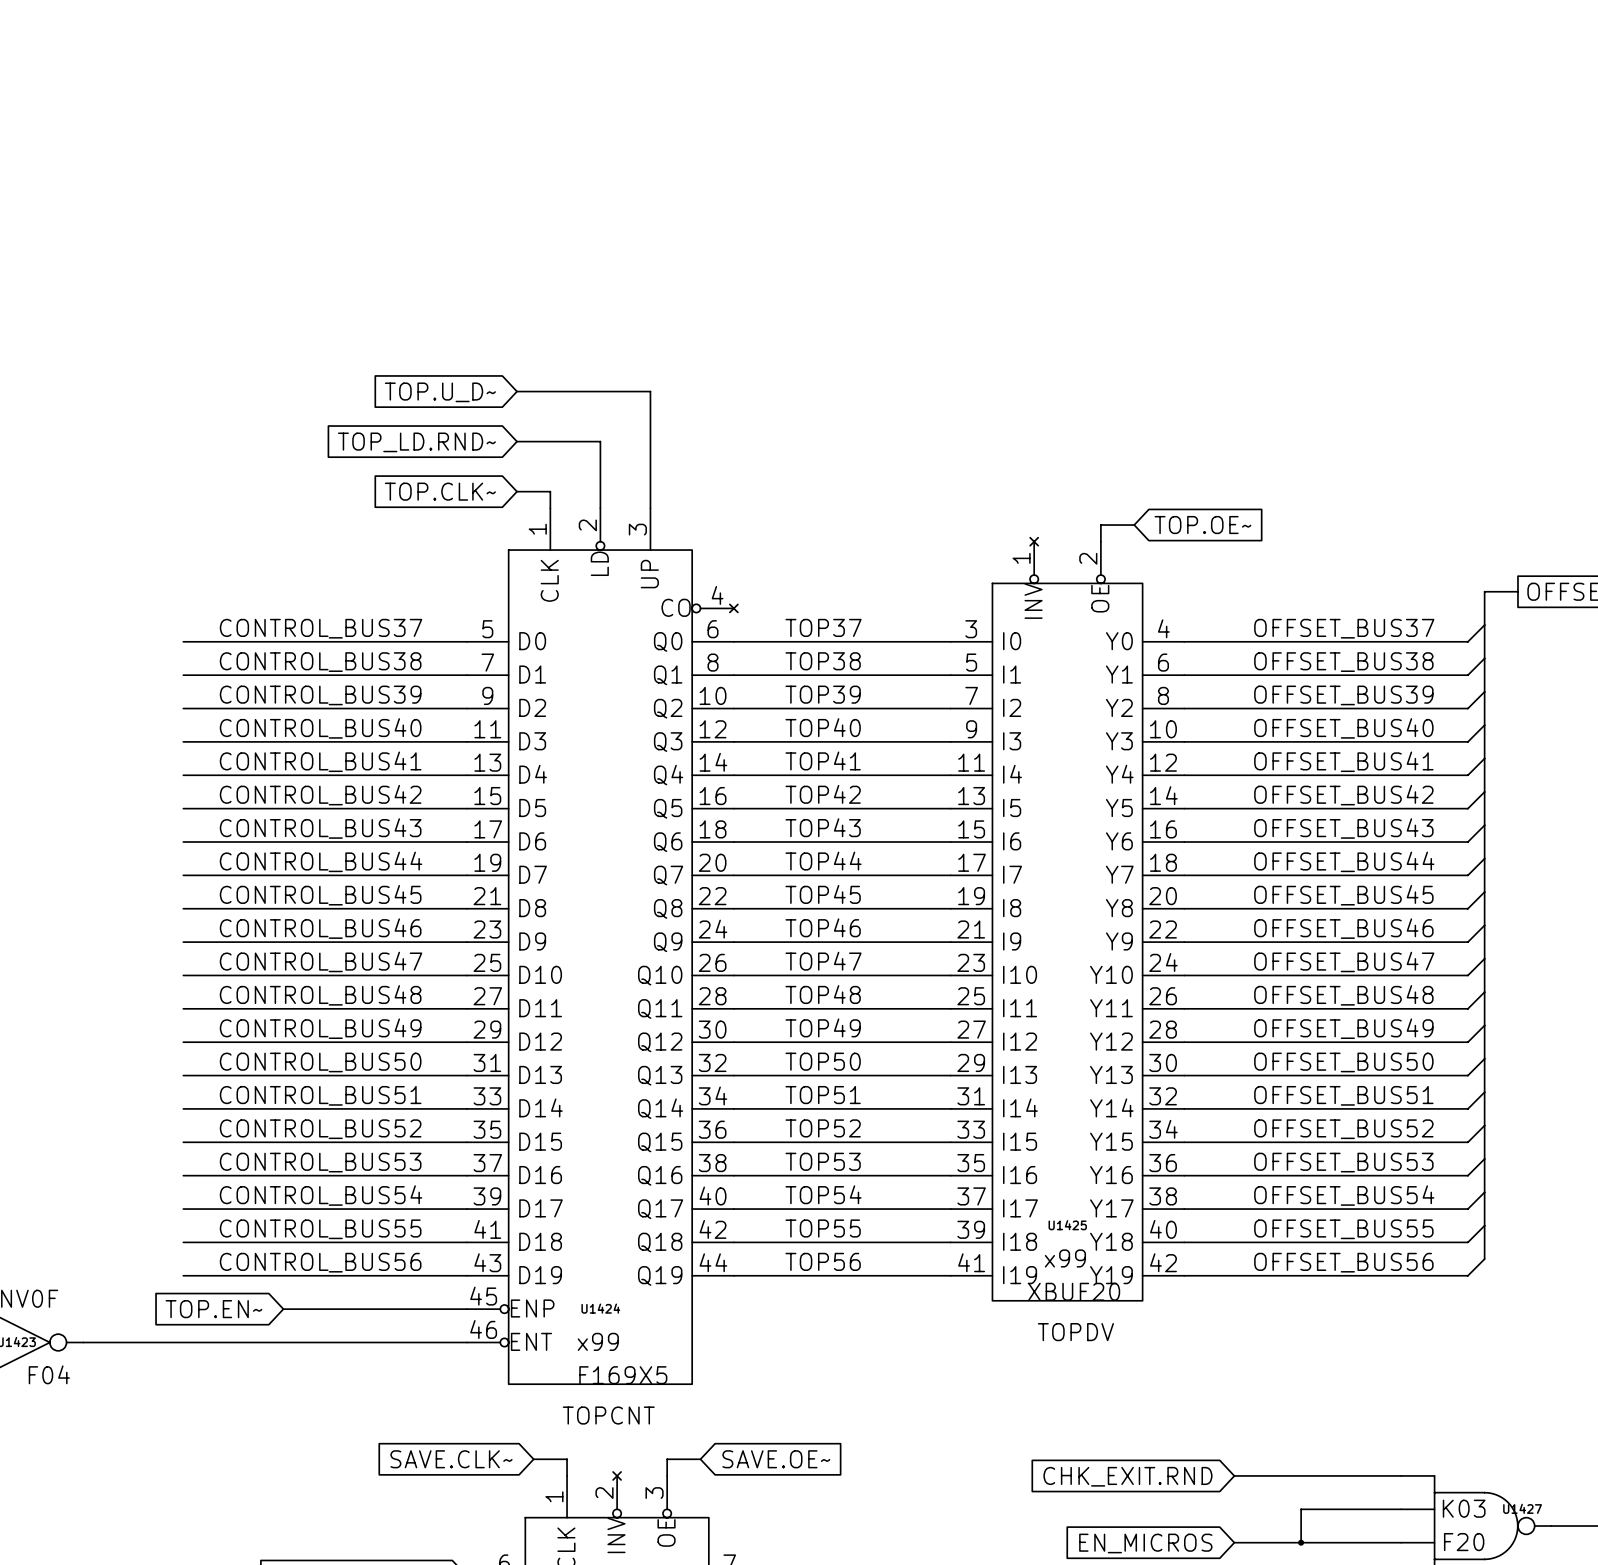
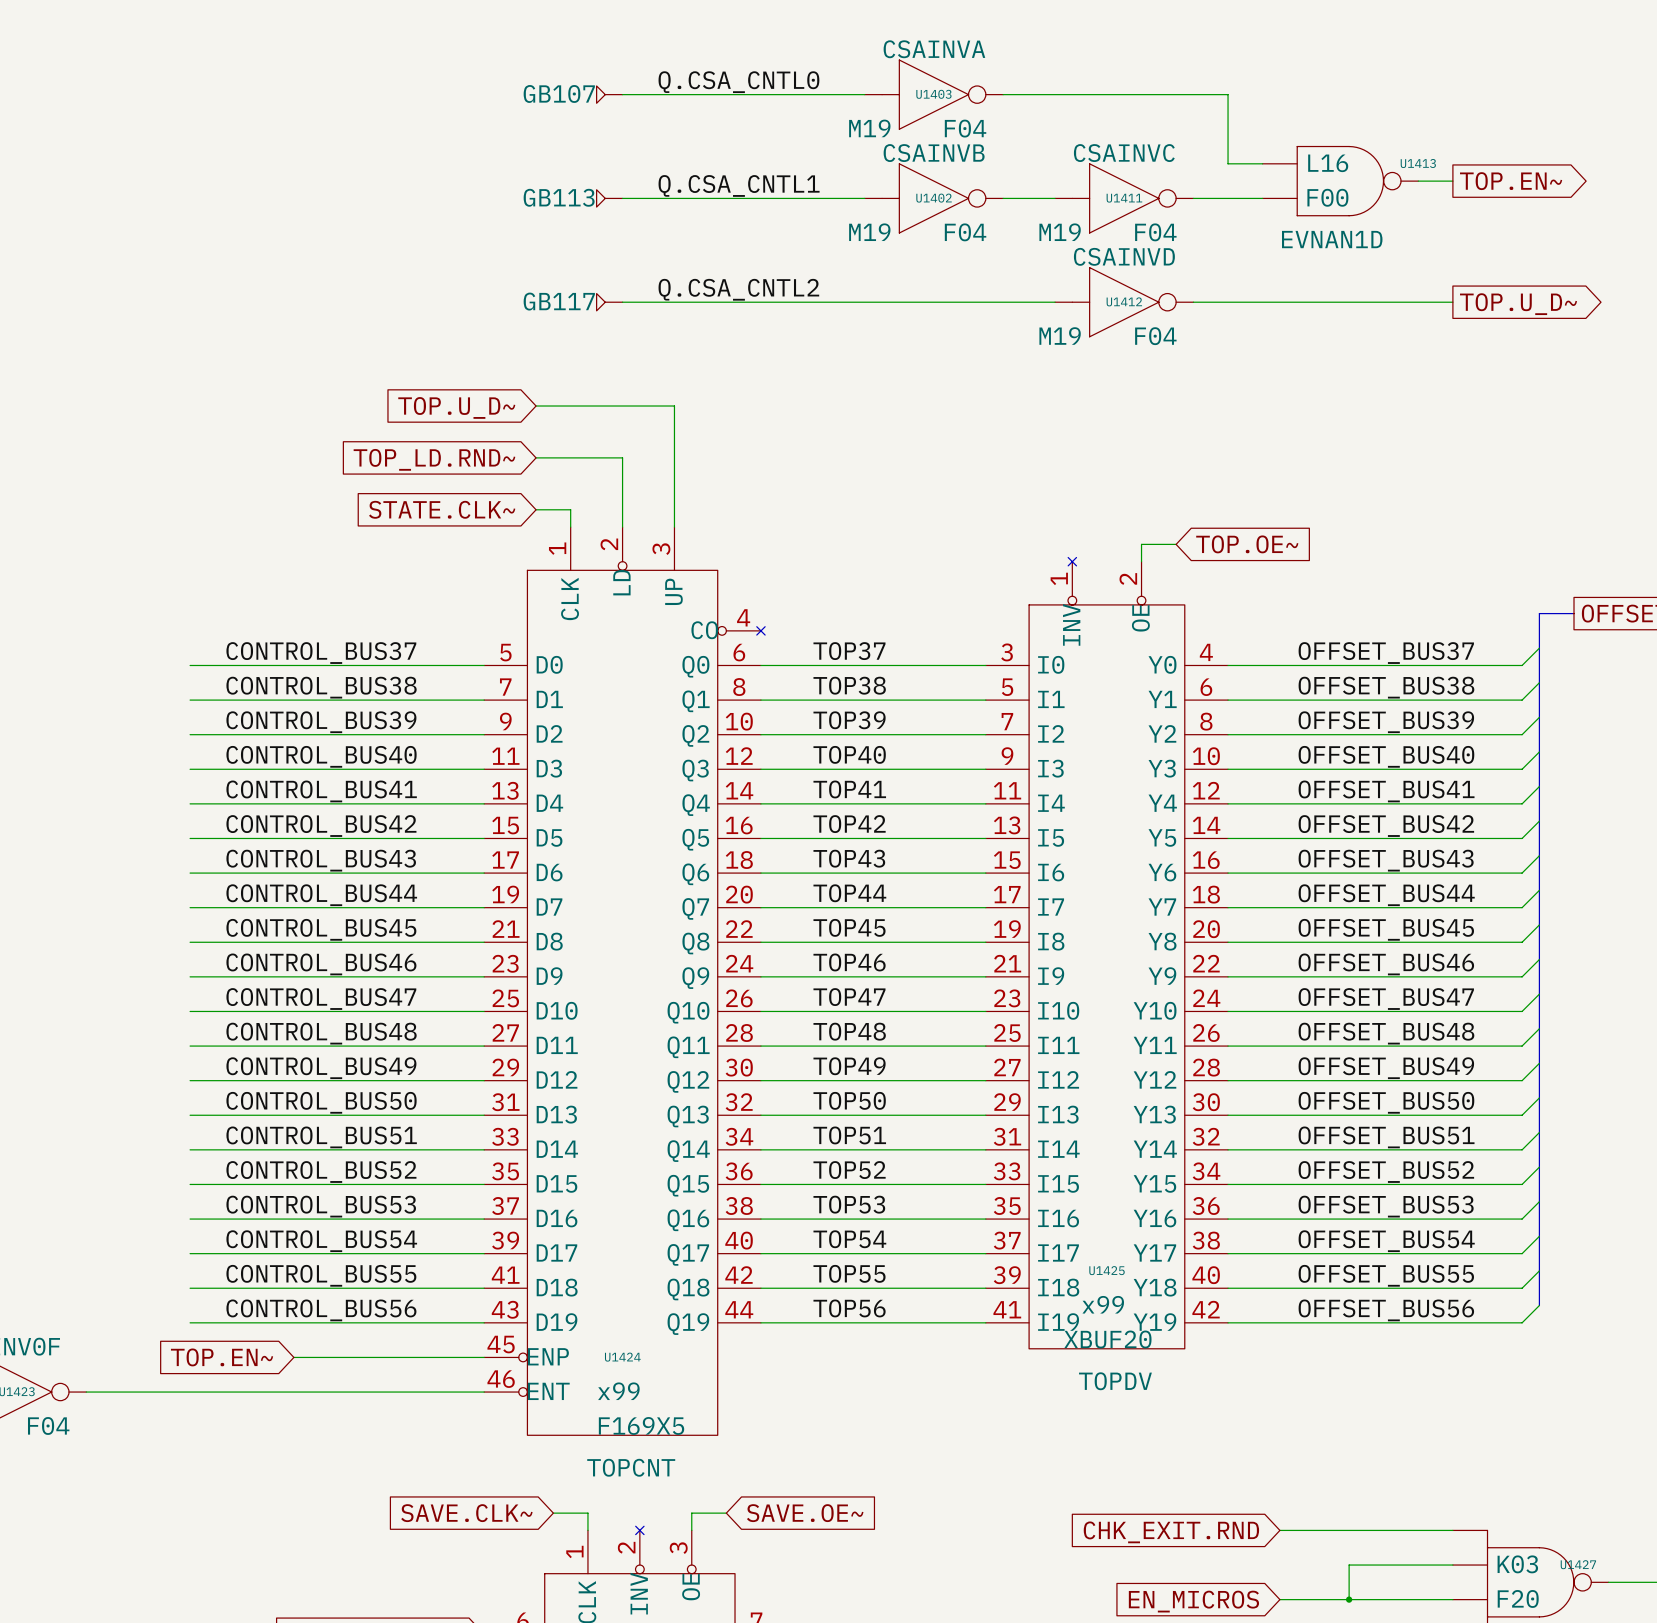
label: none -> Q.CSA_CNTL0 (738, 82)
GB107: none -> (609, 94)
wire: none -> (622, 94) (864, 94)
U1403: none -> F04 (933, 94)
wire: none -> (1003, 94) (1228, 94) (1228, 163) (1262, 163)
U1413: none -> F00 (1340, 181)
wire: none -> (1418, 181) (1452, 181)
global label: none -> TOP.EN~ (1511, 181)
label: none -> Q.CSA_CNTL1 (739, 185)
GB113: none -> (609, 198)
wire: none -> (622, 198) (864, 198)
U1402: none -> F04 (933, 198)
wire: none -> (1003, 198) (1055, 198)
U1411: none -> F04 (1124, 198)
wire: none -> (1193, 198) (1262, 198)
label: none -> Q.CSA_CNTL2 (738, 289)
GB117: none -> (609, 302)
wire: none -> (622, 302) (1055, 302)
U1412: none -> F04 (1124, 302)
wire: none -> (1193, 302) (1452, 302)
global label: none -> TOP.U_D~ (1518, 304)
global label: TOP.CLK~ (440, 491) -> STATE.CLK~ (442, 509)

